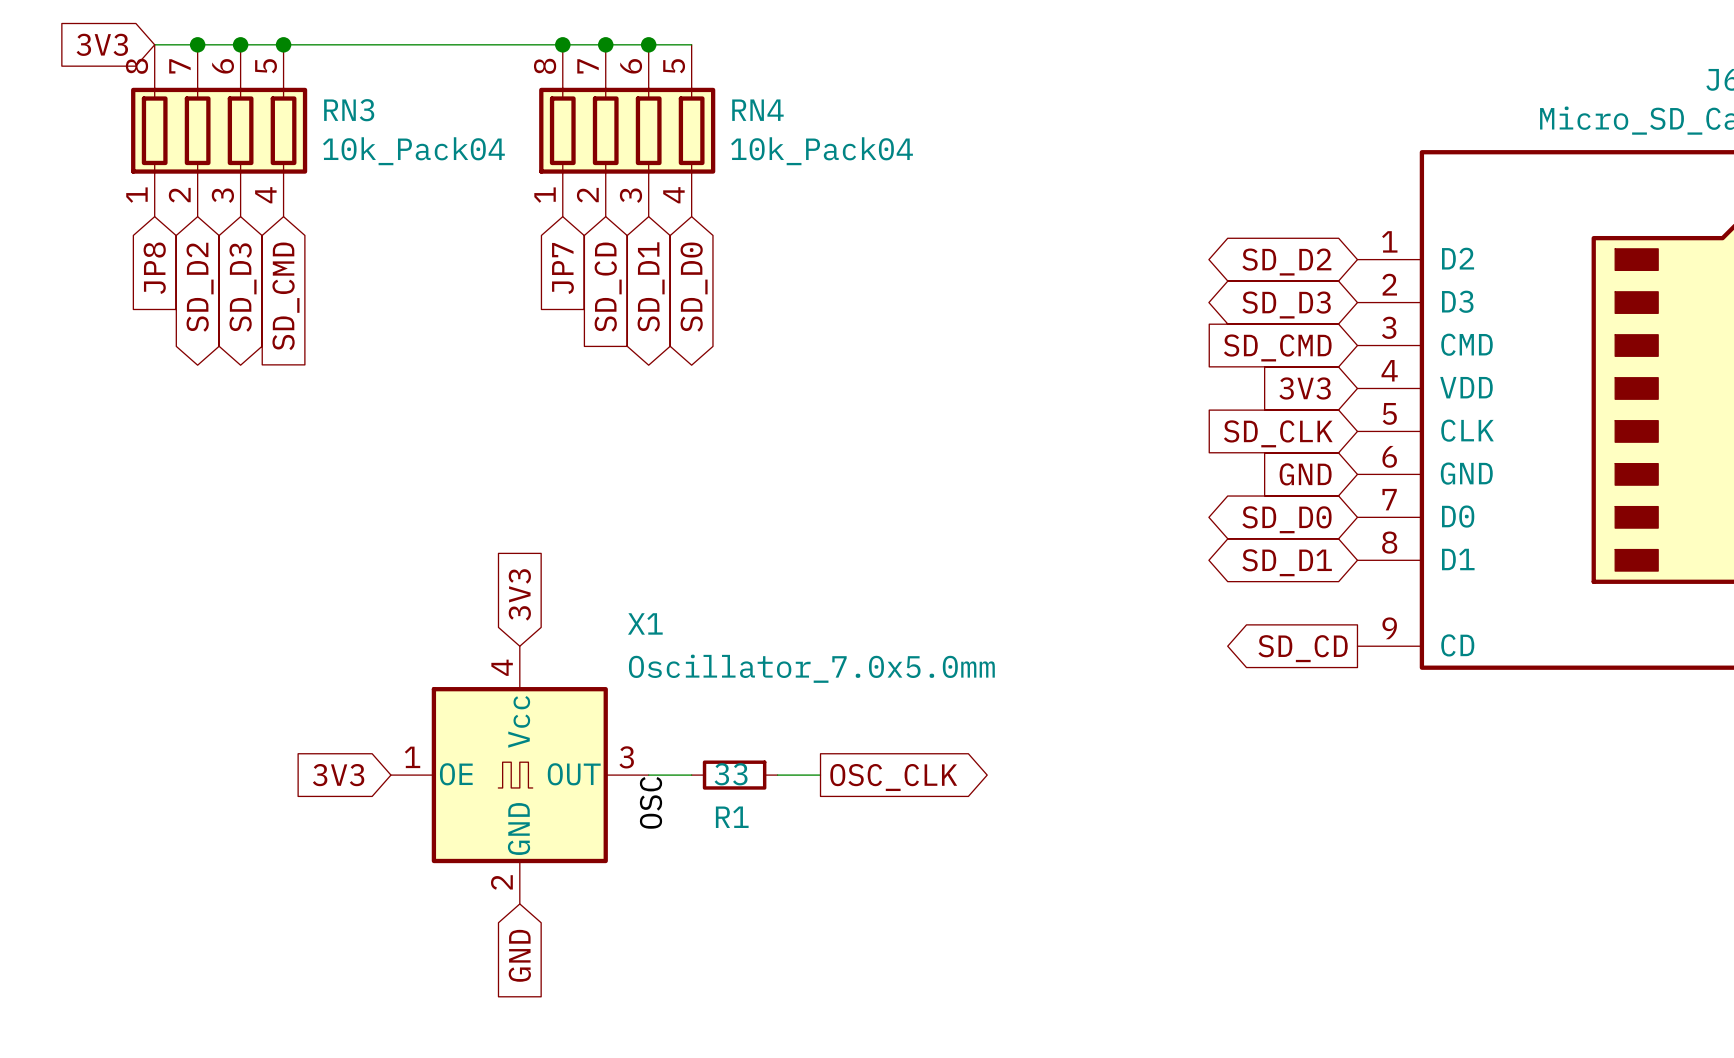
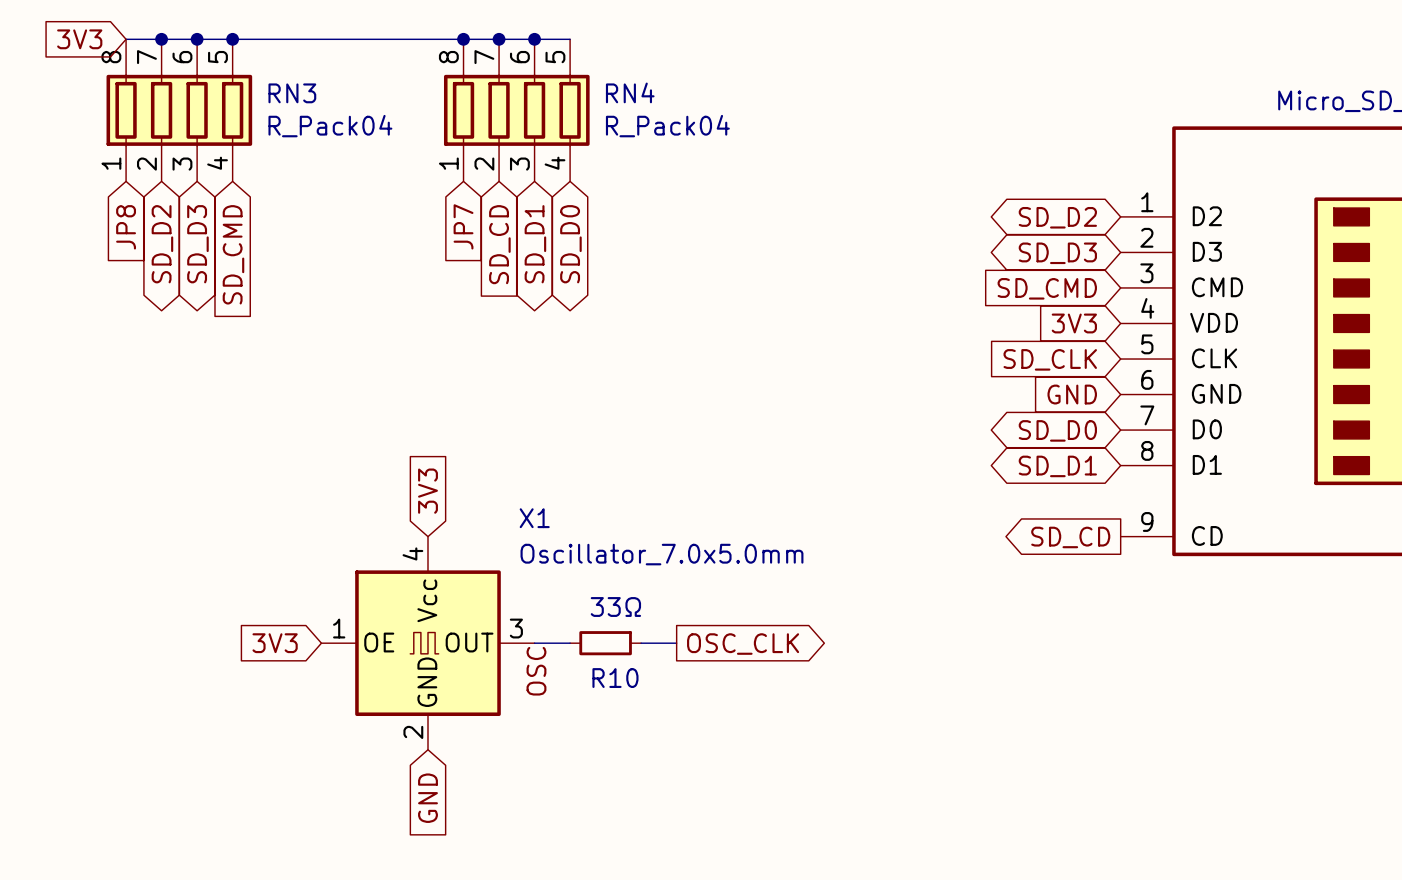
RN3 value: 10k_Pack04 (413, 151) -> R_Pack04 (330, 126)
RN4 value: 10k_Pack04 (821, 151) -> R_Pack04 (667, 126)
R1 value: 33 (731, 774) -> 33Ω (615, 607)
R1 name: R1 (732, 817) -> R10 (615, 678)

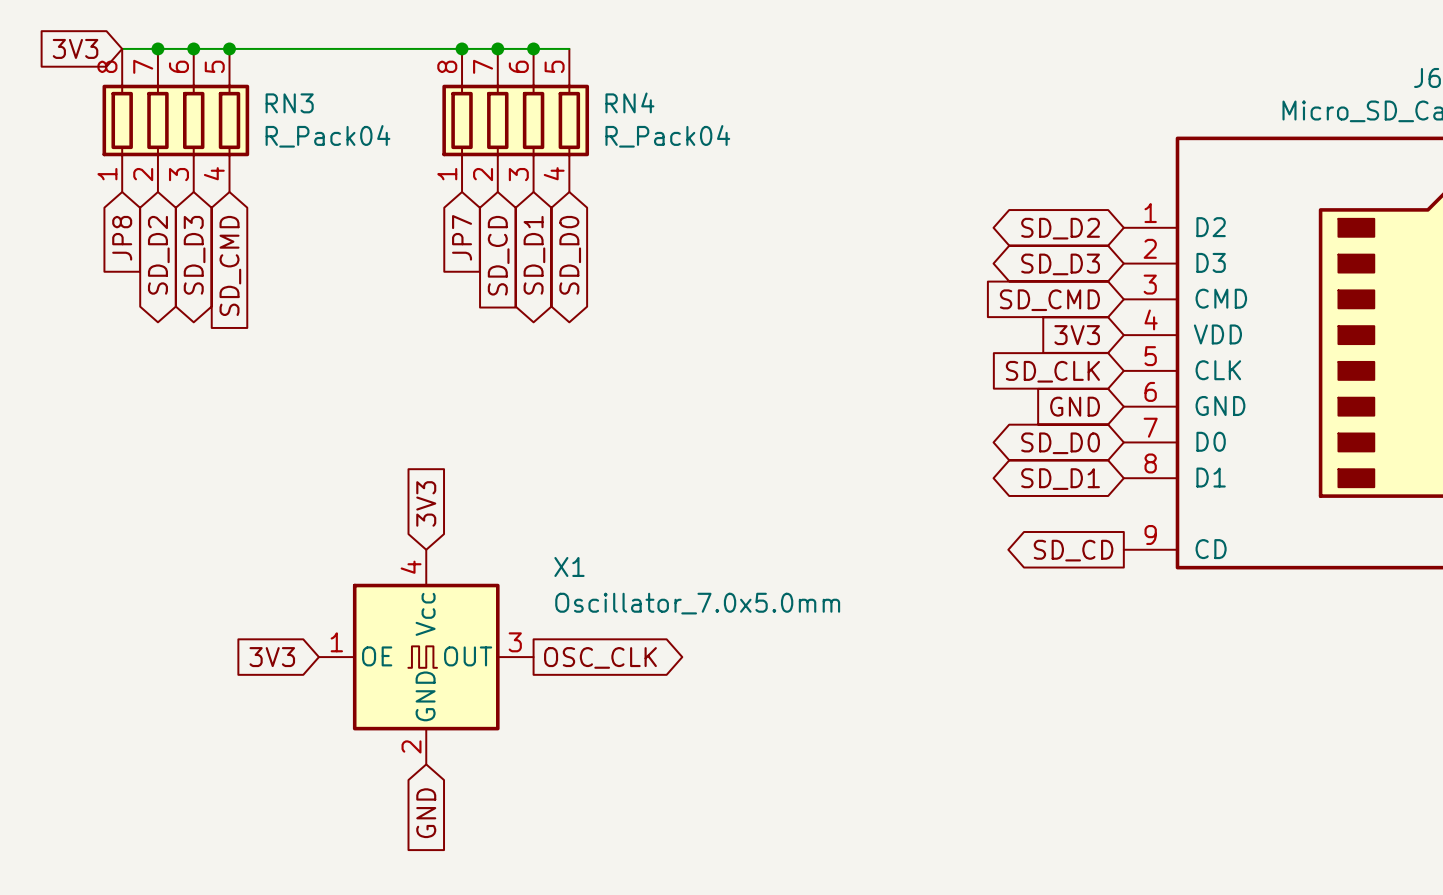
X1 name position: X1 (534, 518) -> X1 (569, 566)
X1 value position: Oscillator_7.0x5.0mm (661, 554) -> Oscillator_7.0x5.0mm (697, 603)
wire: (534, 643) (570, 643) -> none
R10: 33Ω (605, 643) -> none
wire: (641, 643) (676, 643) -> none
global label position: OSC_CLK (743, 644) -> OSC_CLK (600, 657)
label: OSC (536, 671) -> none

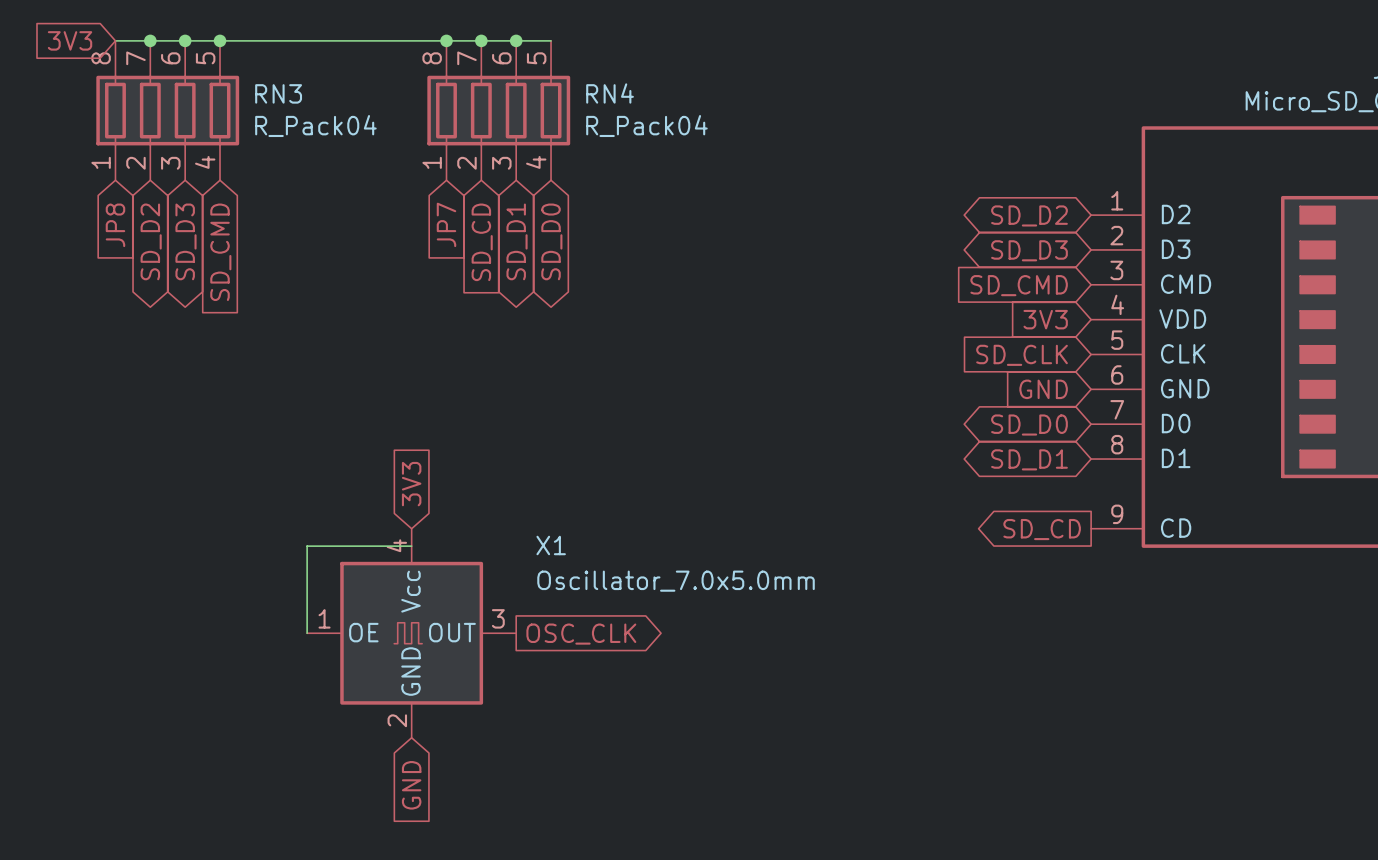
wire: none -> (411, 546) (307, 546) (307, 633)
global label: 3V3 (272, 657) -> none

